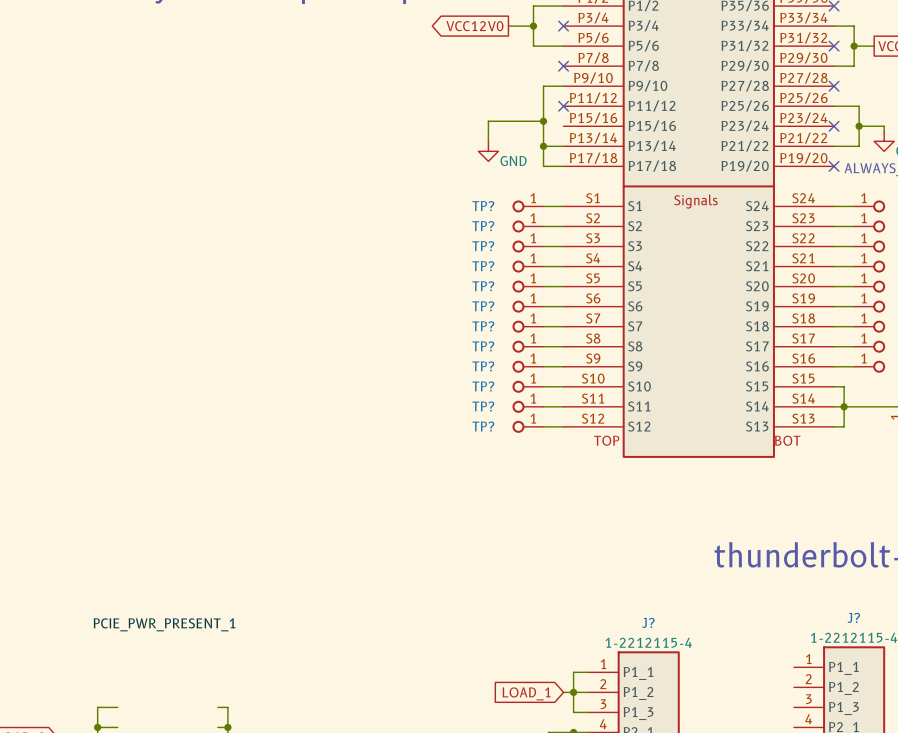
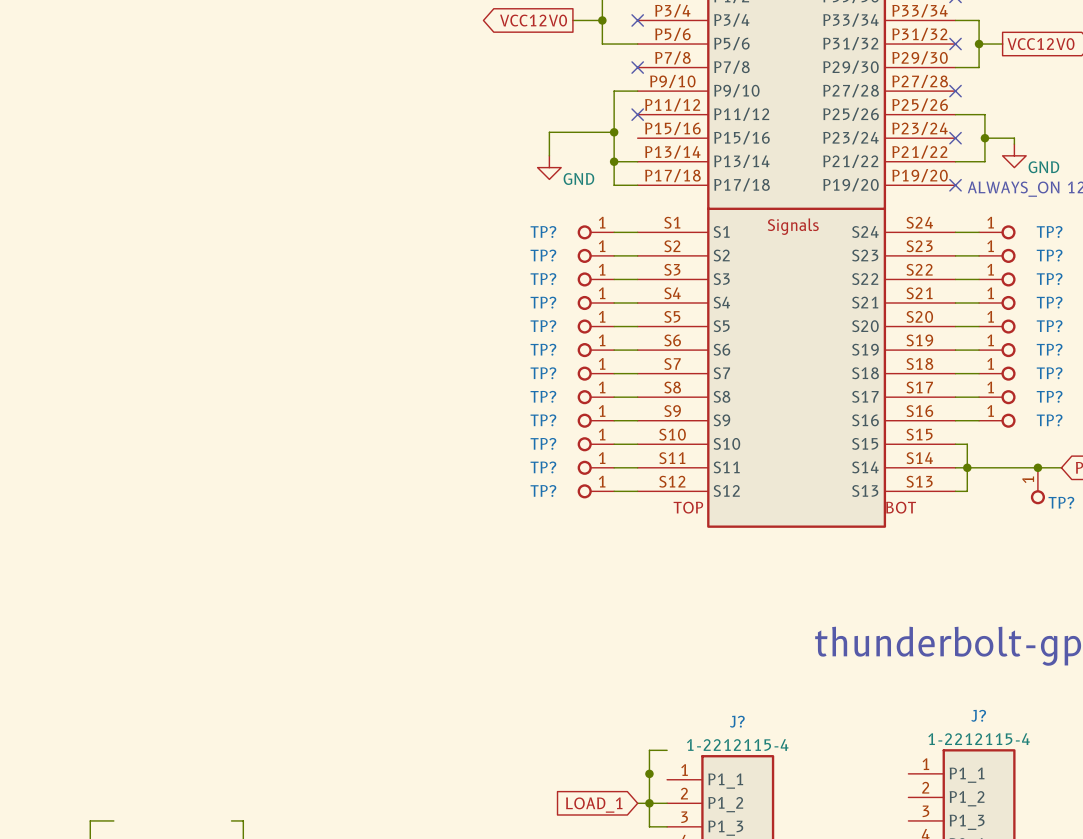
label: PCIE_PWR_PRESENT_1 (164, 624) -> none
junction: none -> (649, 773)
wire: (573, 672) (588, 672) -> (649, 779) (649, 750) (667, 750)

